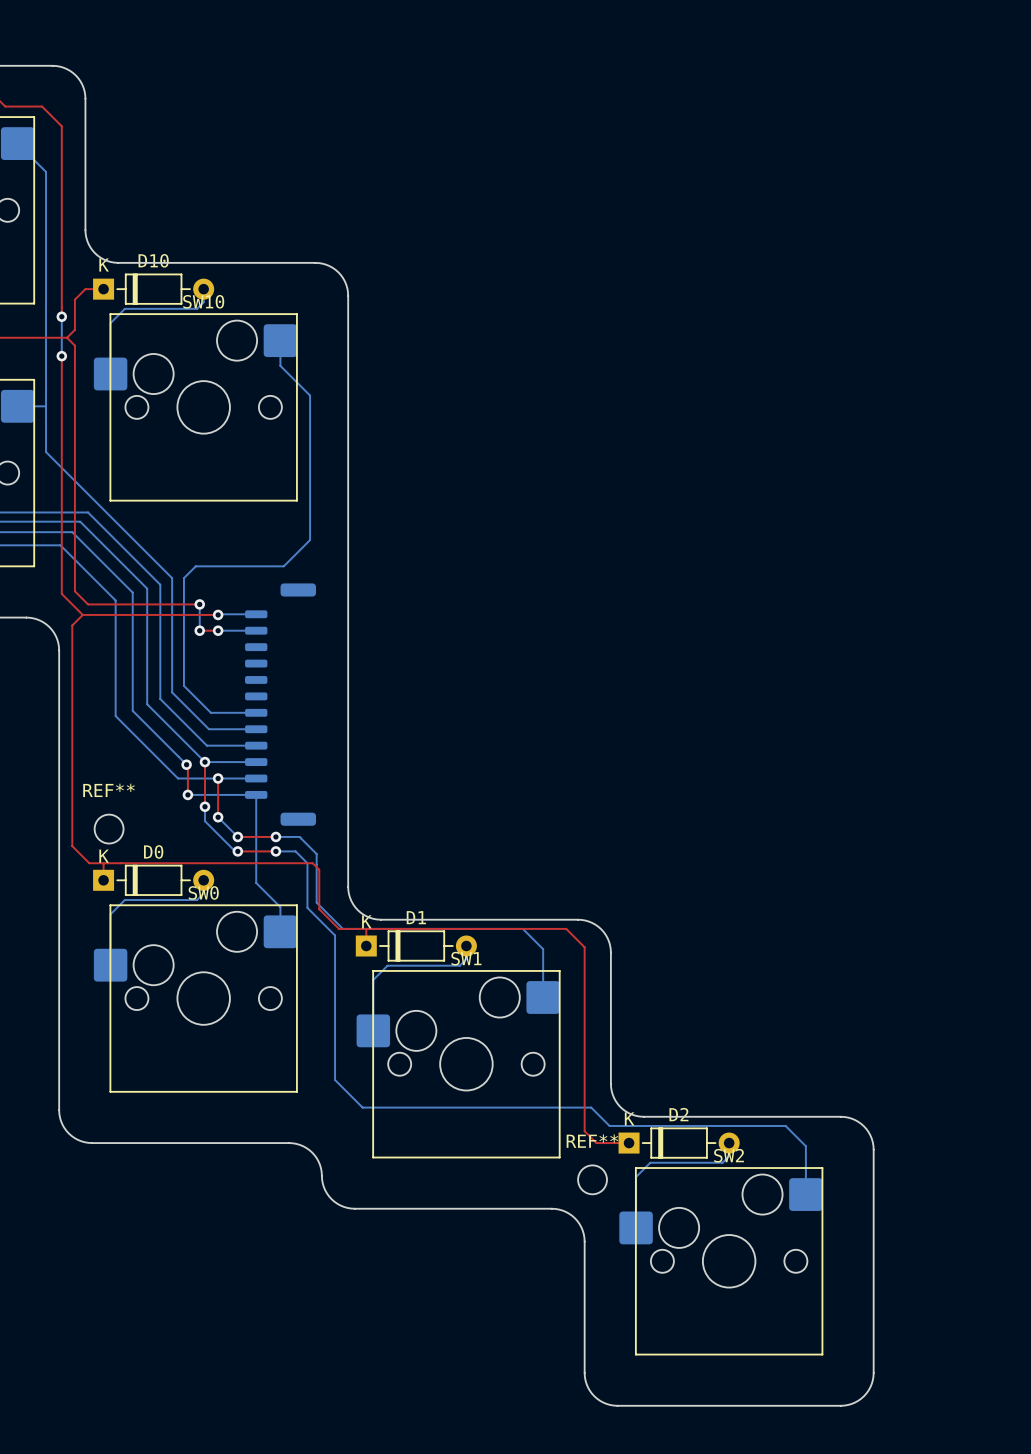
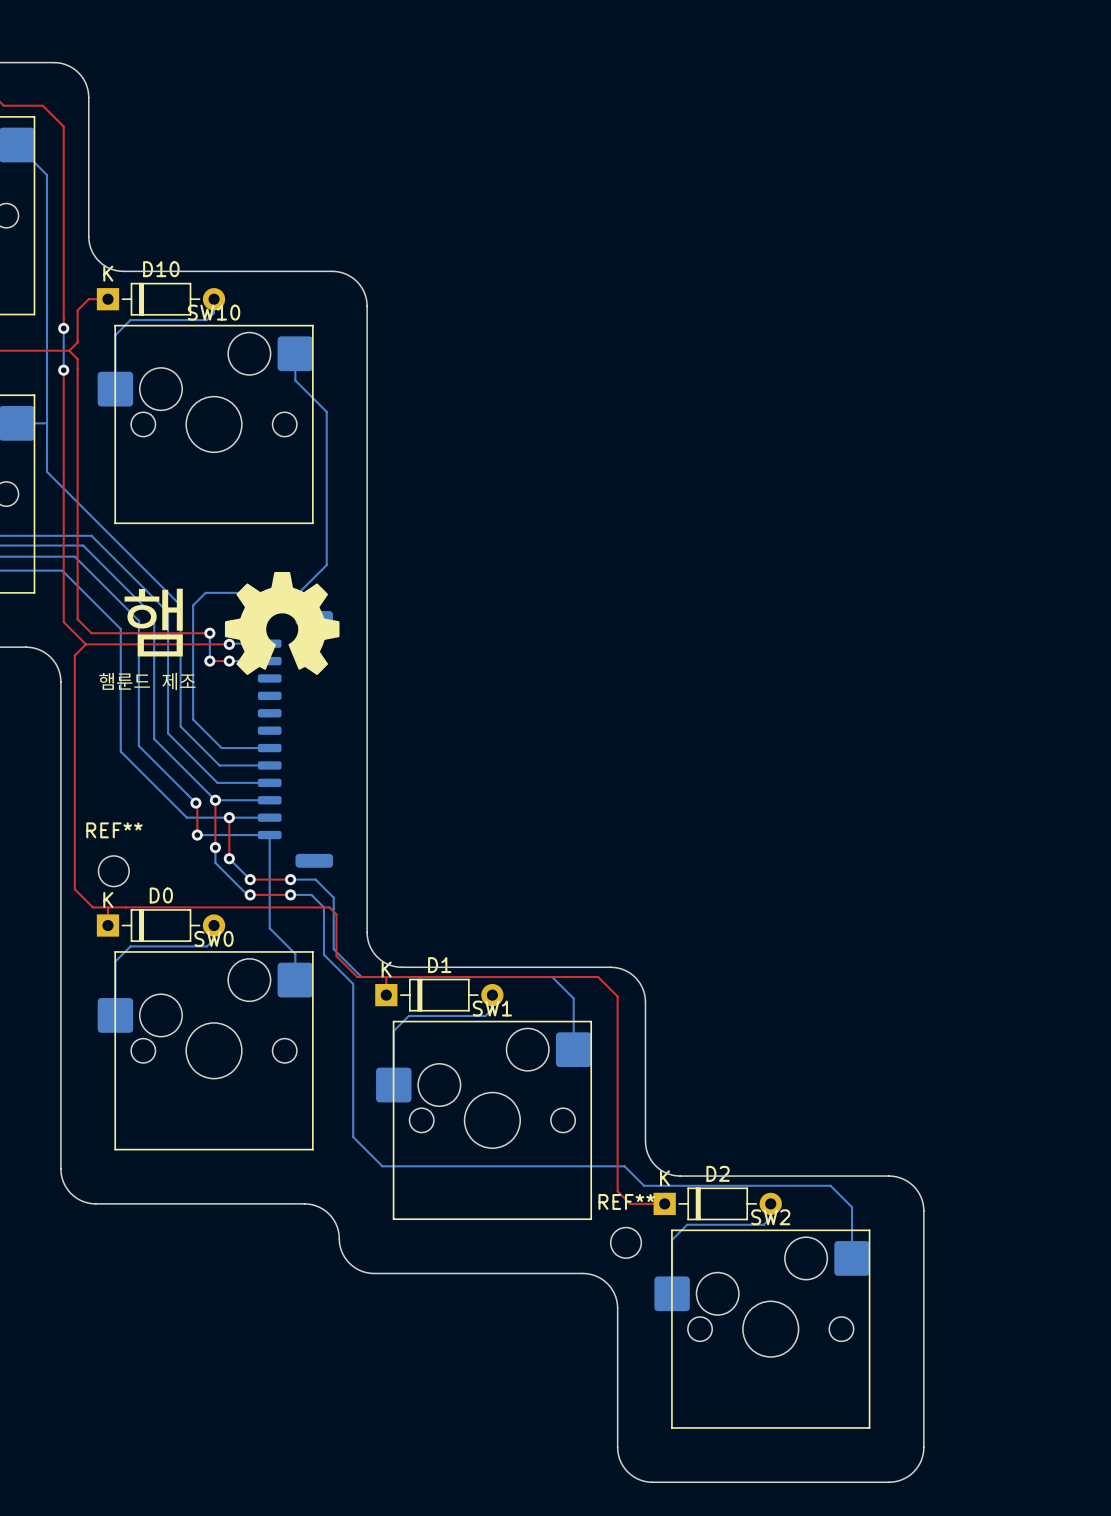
drawing: none -> [224, 571, 340, 676]
text: none -> 햄 (153, 622)
text: none -> 햄룬드 제조 (147, 681)

